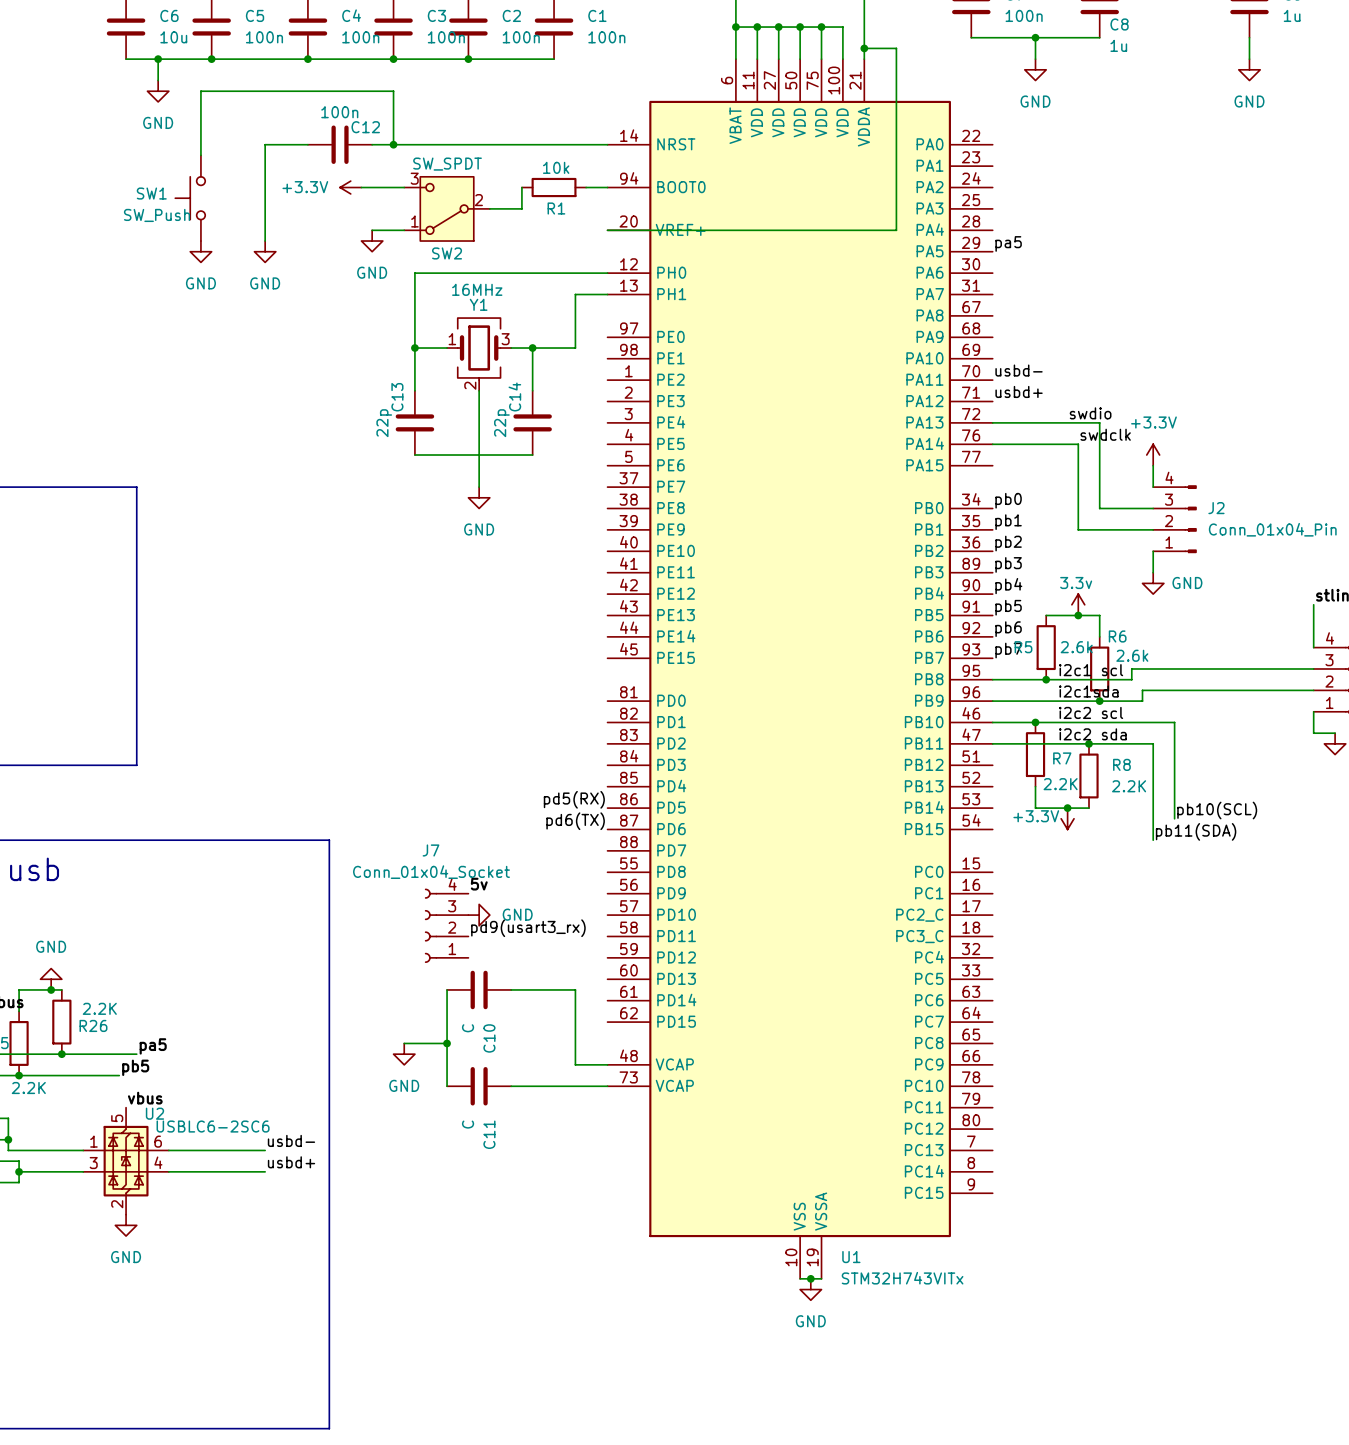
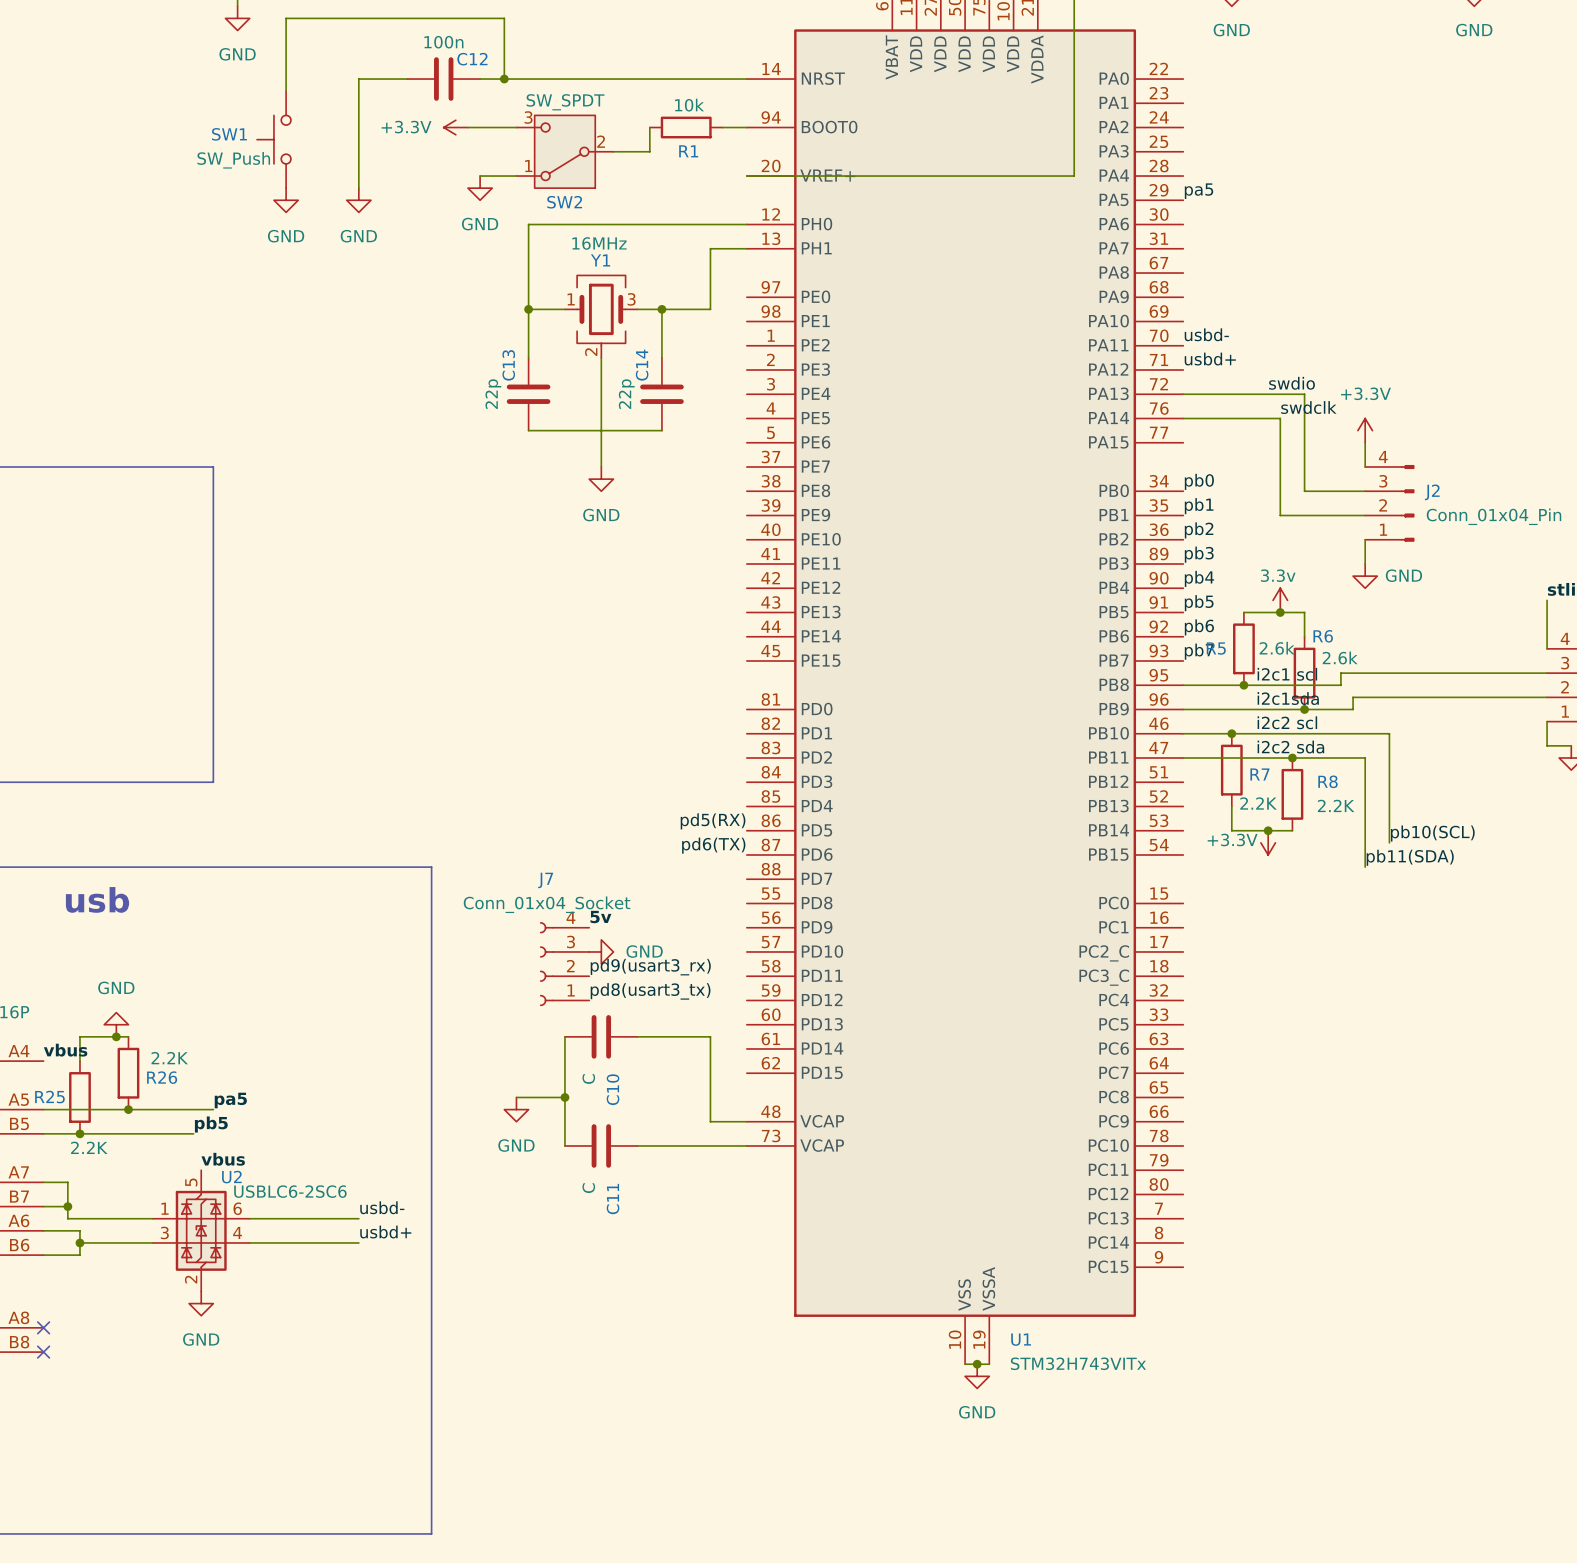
label: none -> pd8(usart3_tx) (650, 991)

